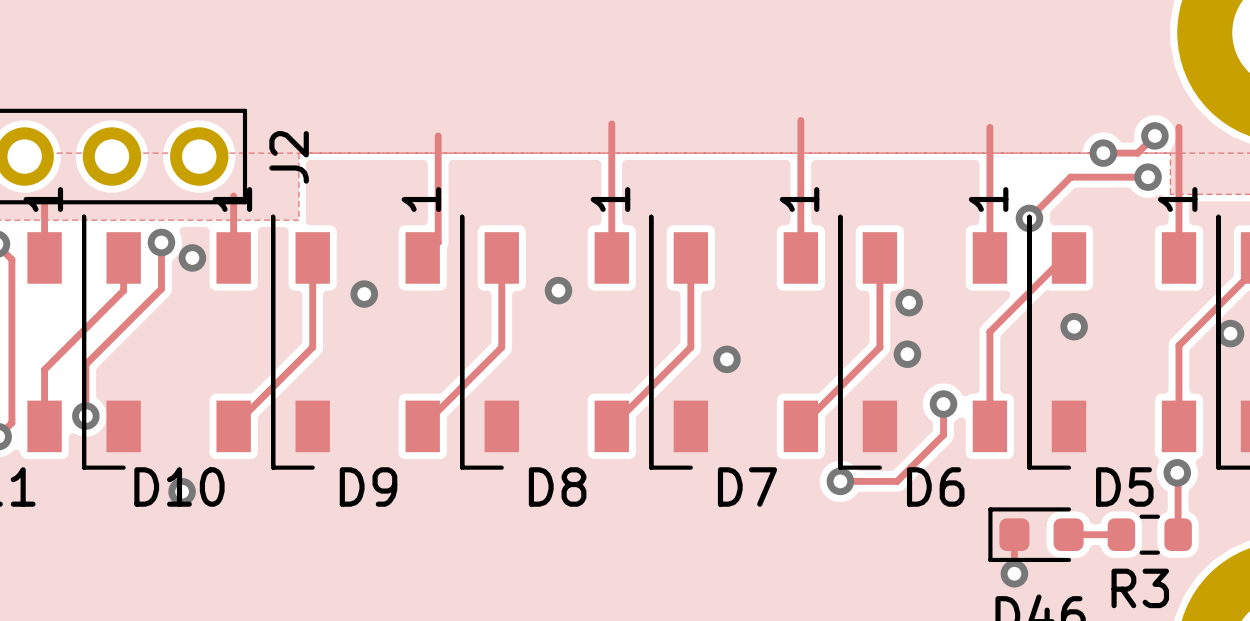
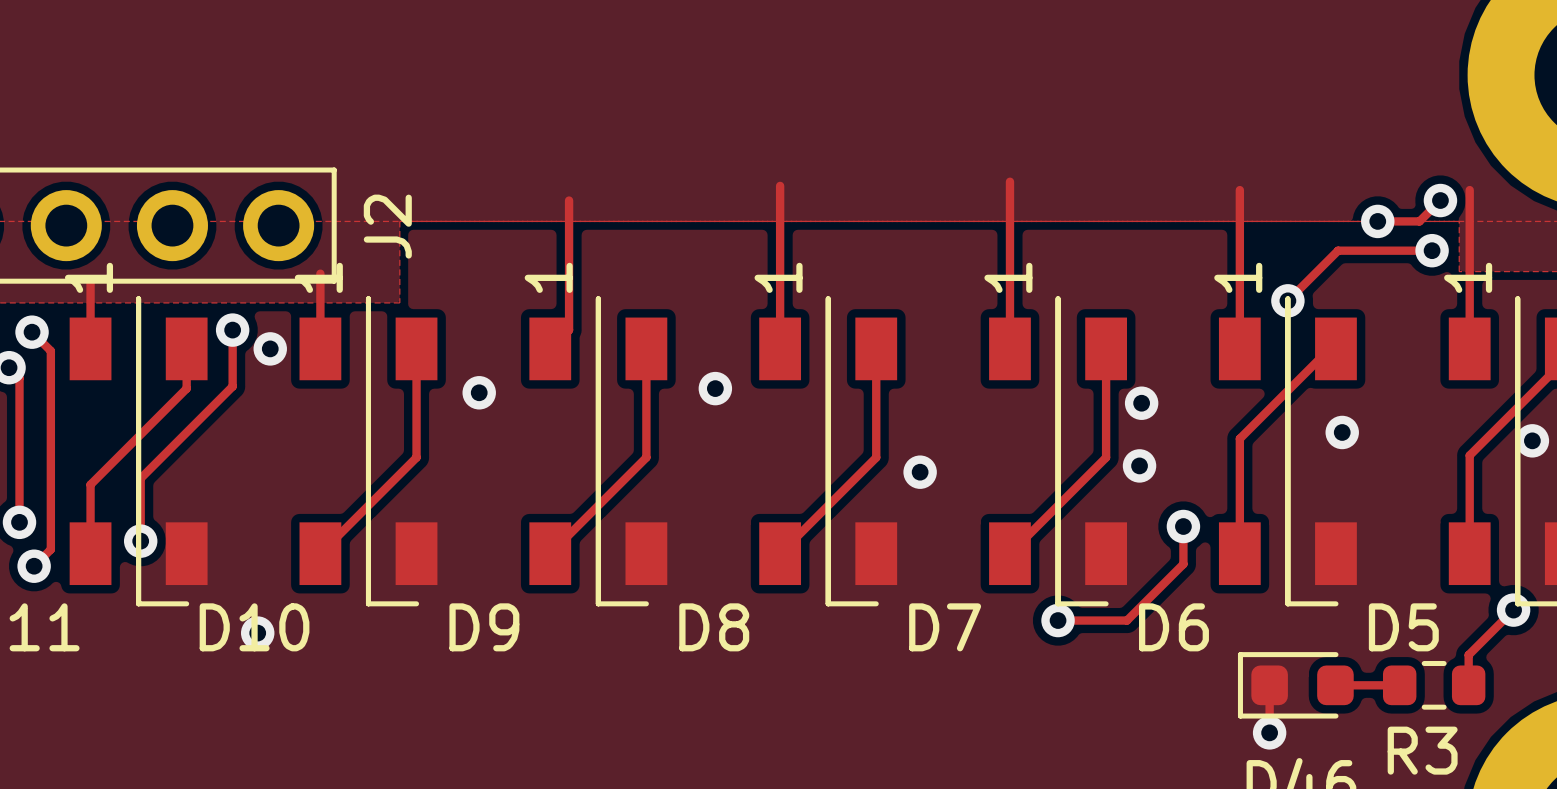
track: (1177, 472) (1178, 509) -> (1513, 610) (1468, 655)
via position: (1177, 472) -> (1513, 610)

